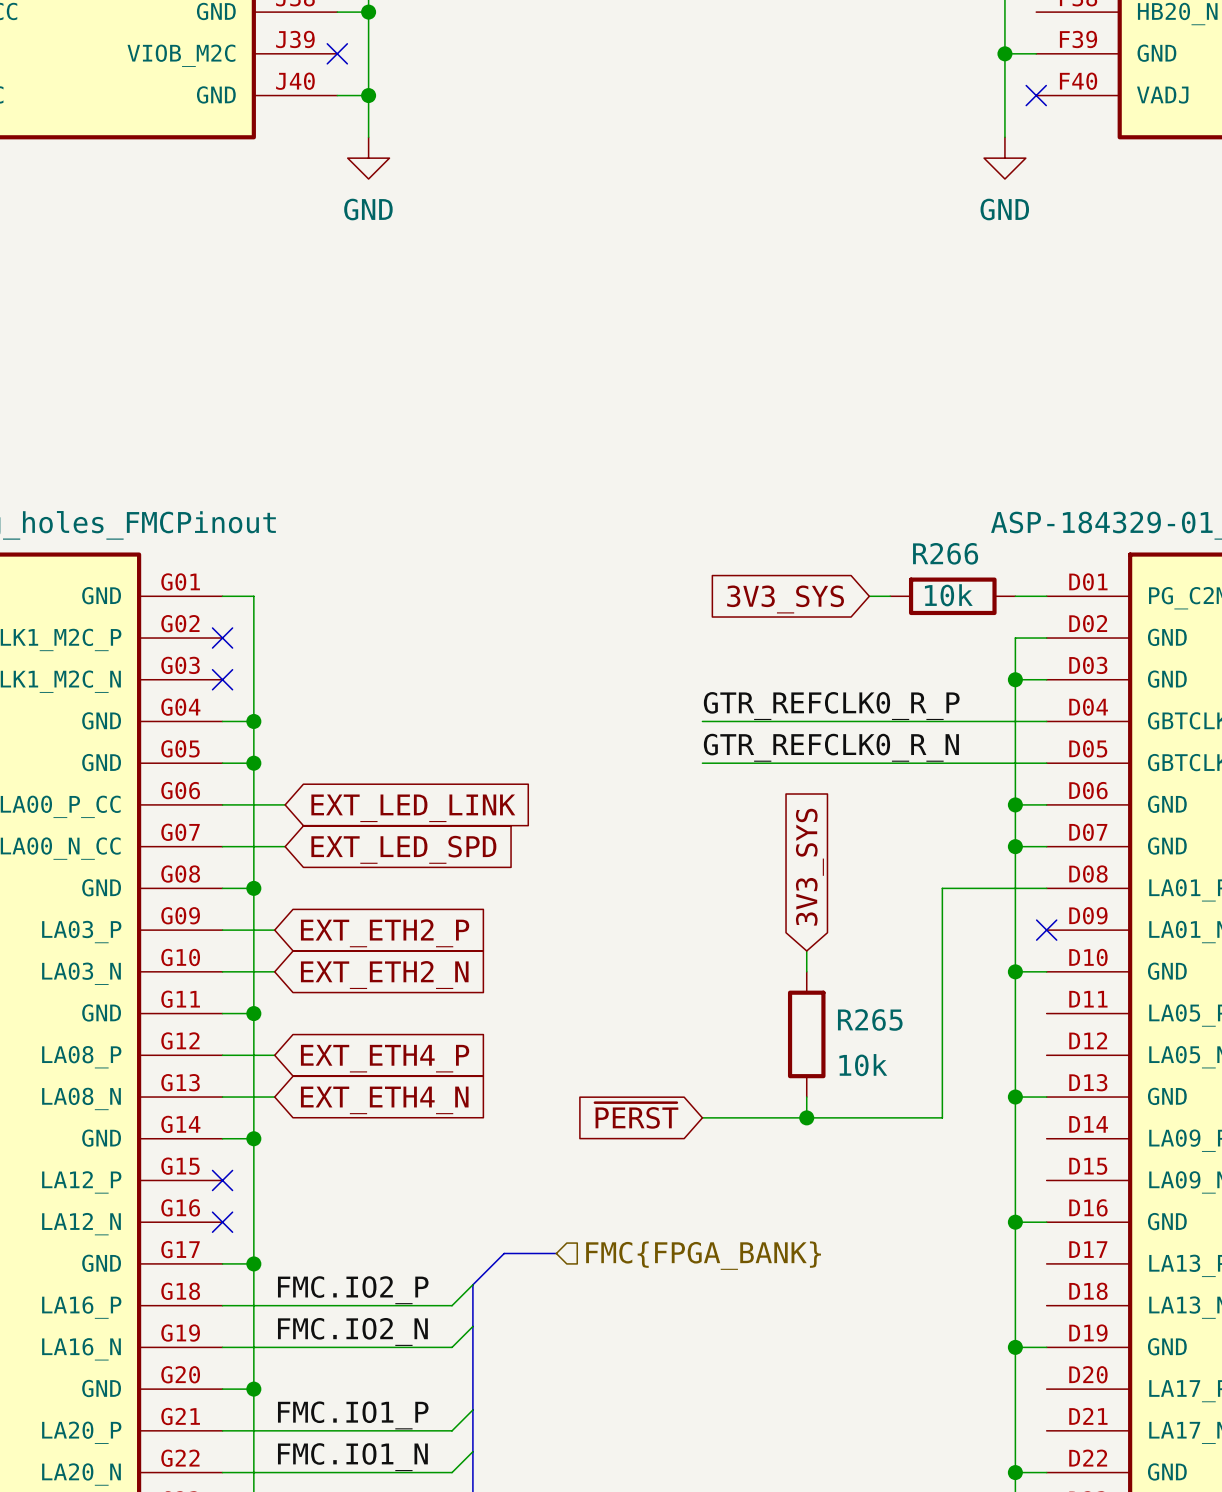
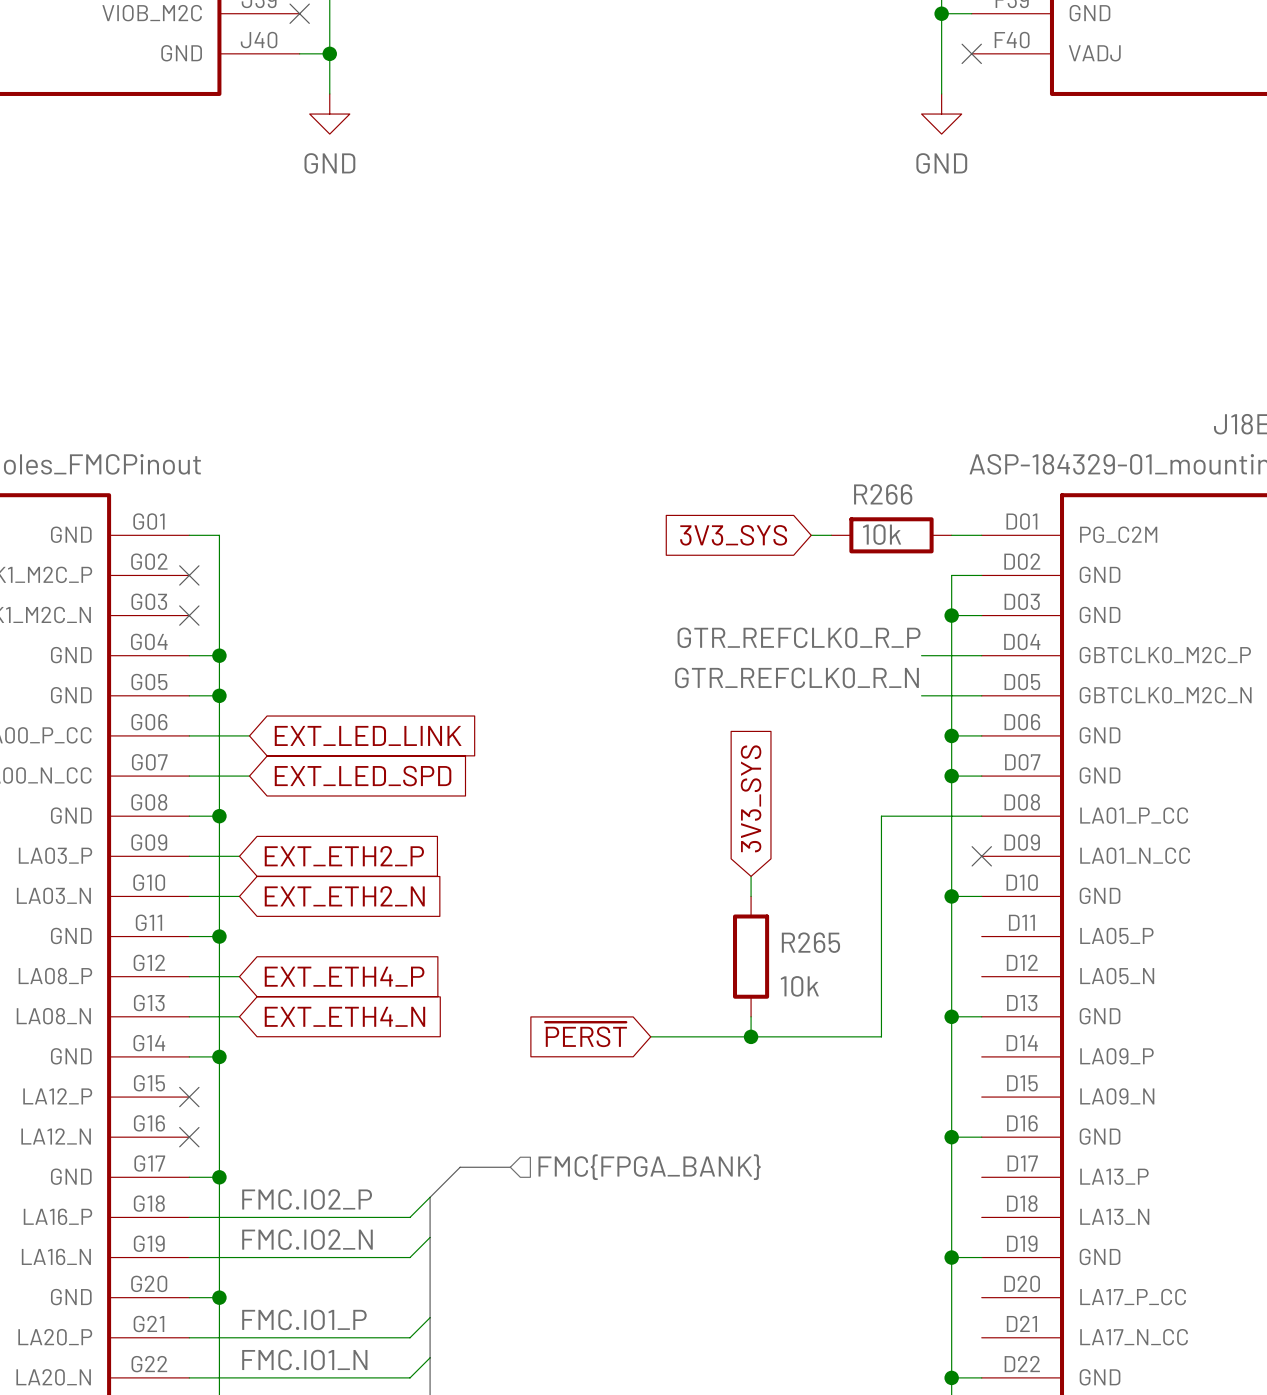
label position: GTR_REFCLK0_R_P (831, 706) -> GTR_REFCLK0_R_P (799, 637)
wire: (702, 721) (984, 721) -> none
label position: GTR_REFCLK0_R_N (831, 747) -> GTR_REFCLK0_R_N (797, 677)
wire: (702, 763) (984, 763) -> none

